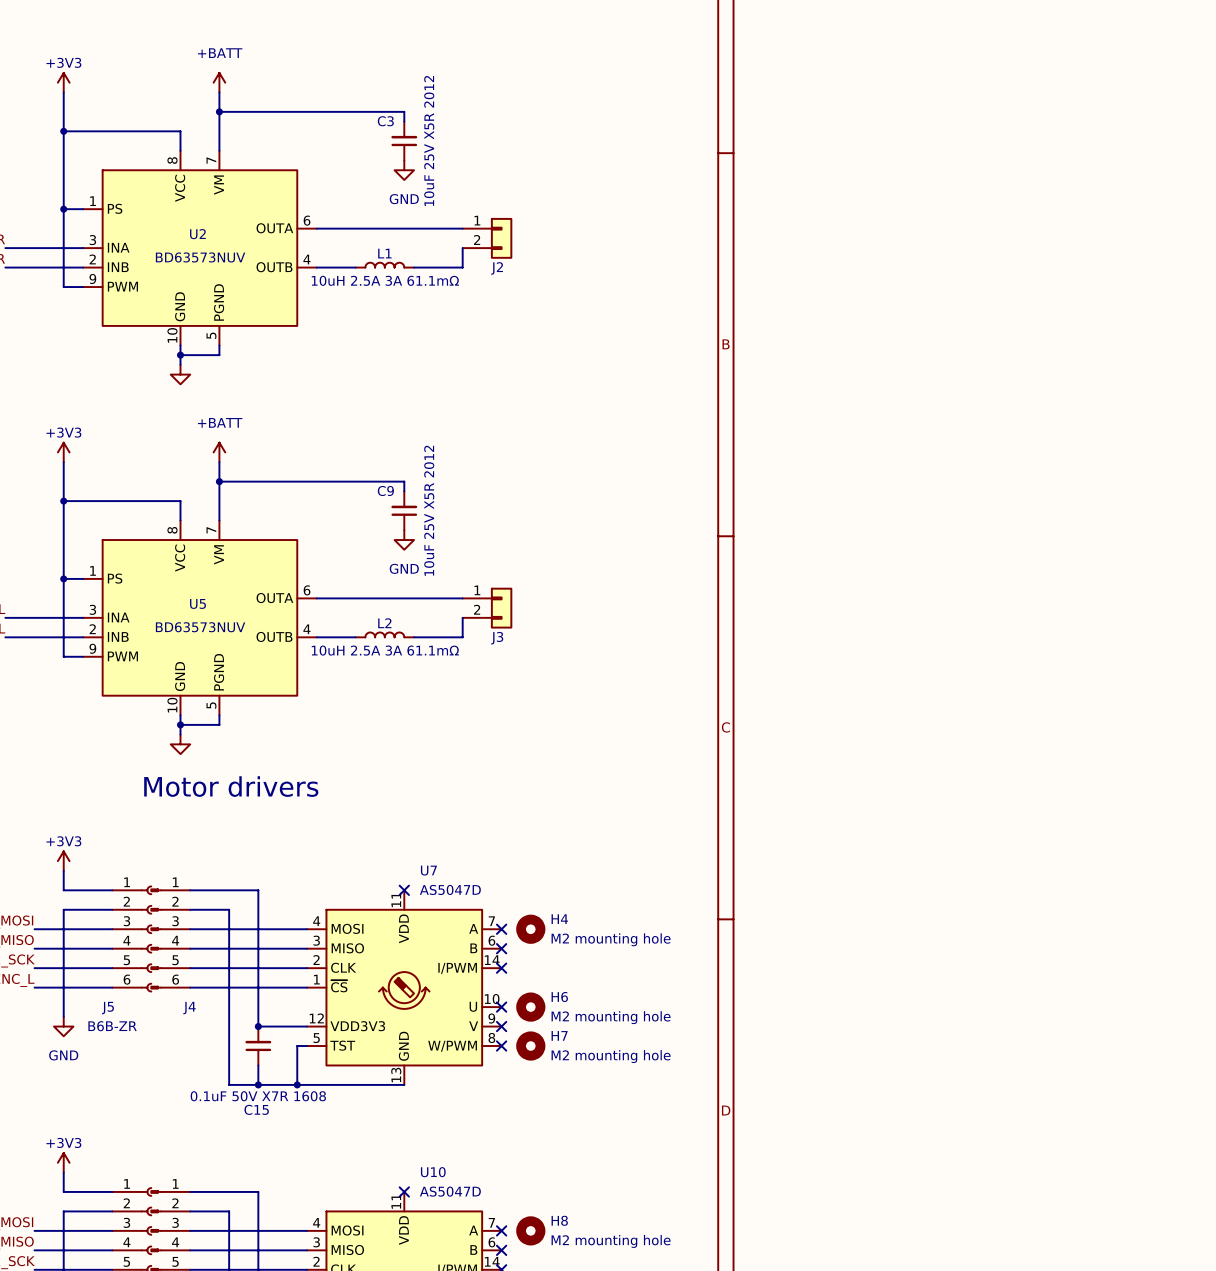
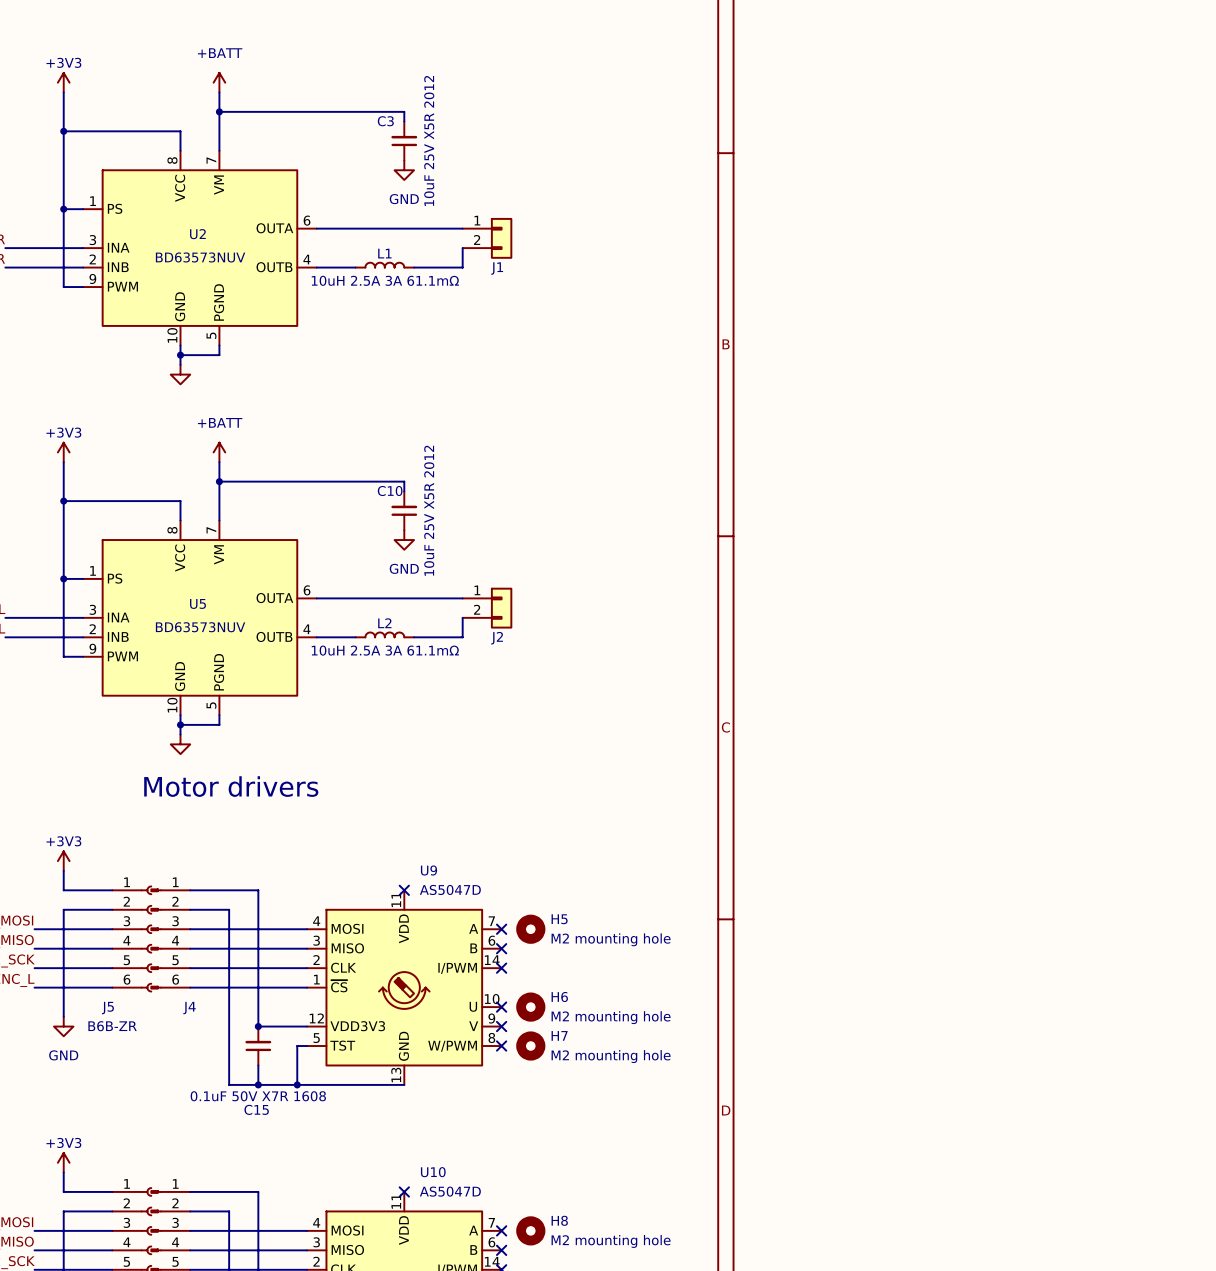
J2 name: J2 (497, 268) -> J1 (497, 268)
C9 name: C9 (385, 491) -> C10 (390, 491)
J3 name: J3 (497, 638) -> J2 (497, 638)
U7 name: U7 (428, 870) -> U9 (429, 870)
H4 name: H4 (559, 919) -> H5 (559, 919)

